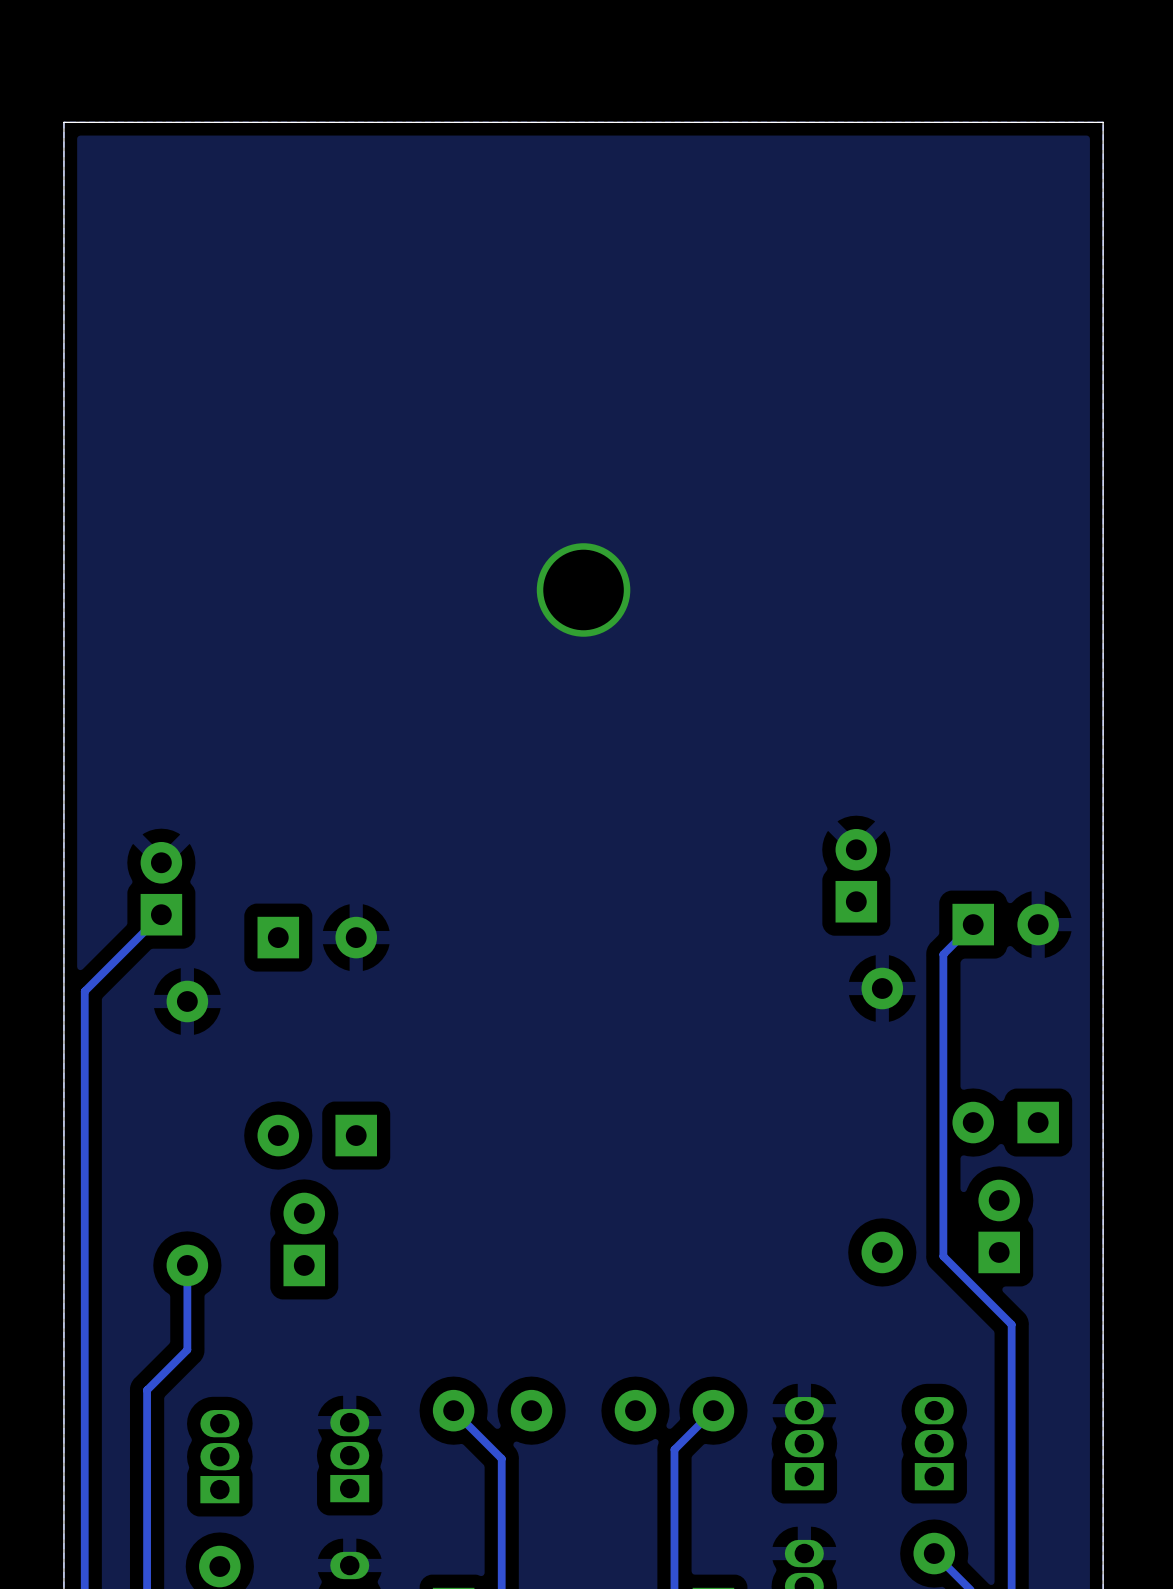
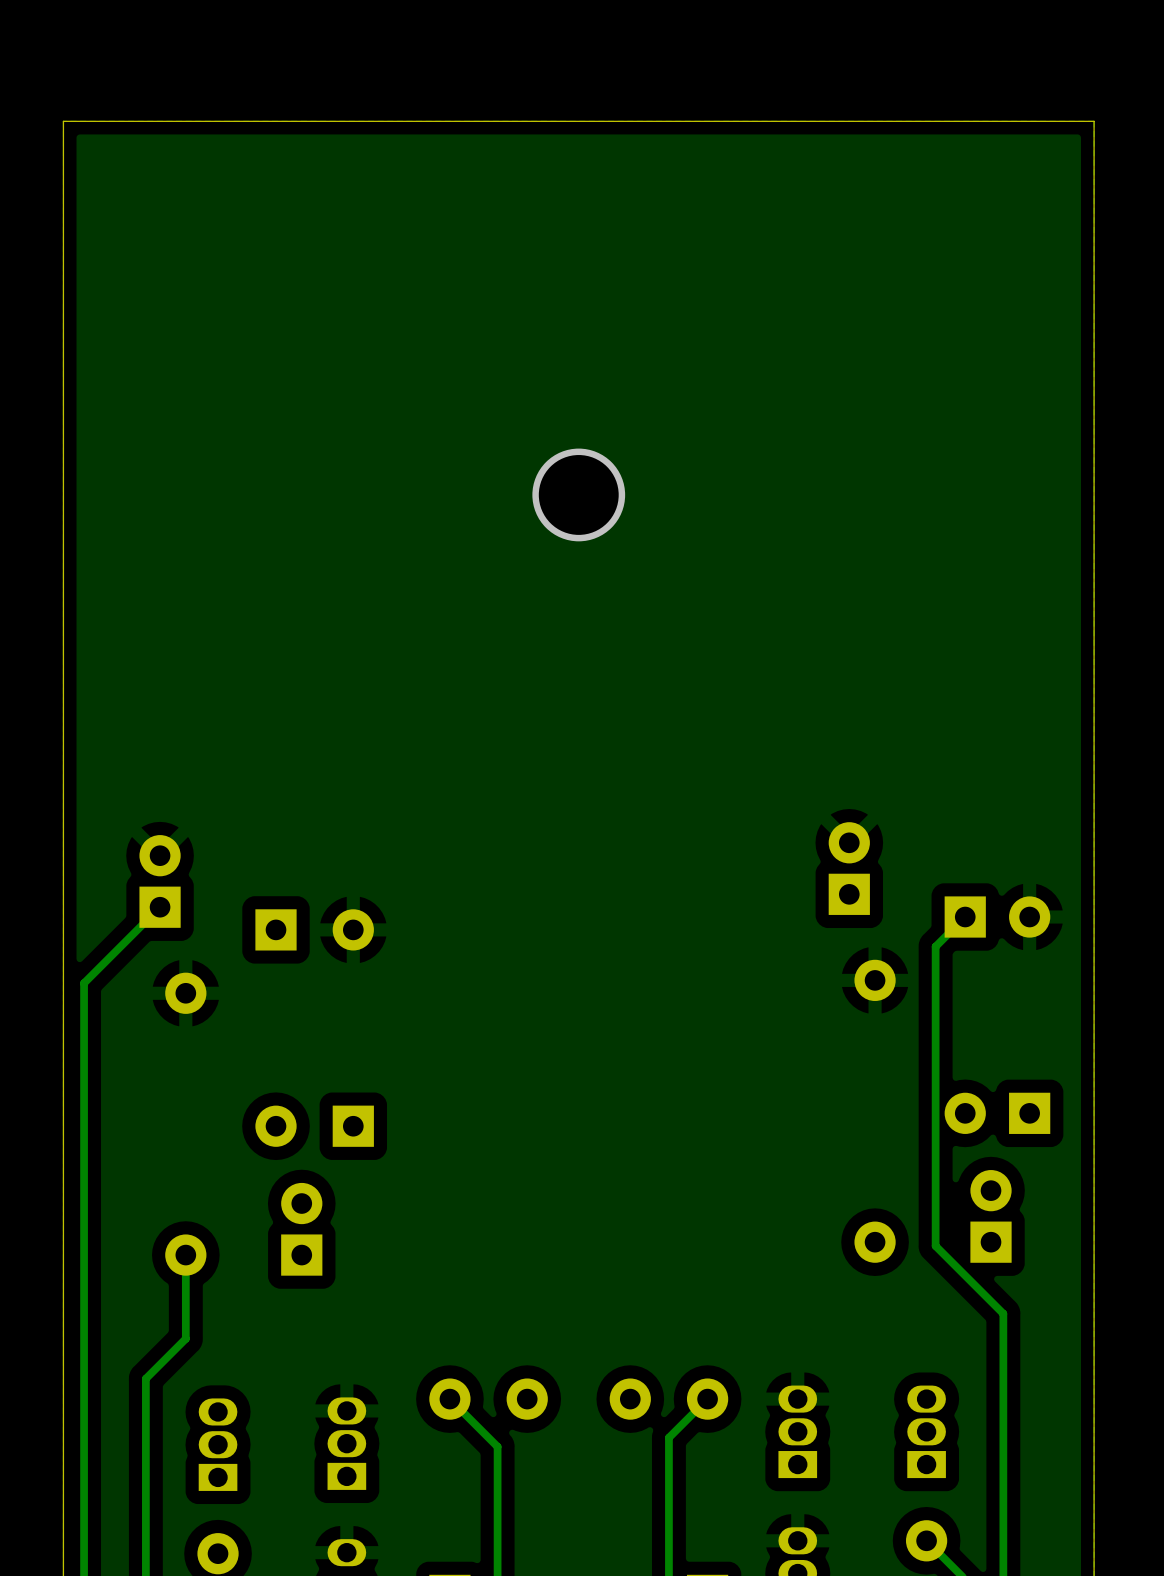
via position: (583, 589) -> (578, 494)

